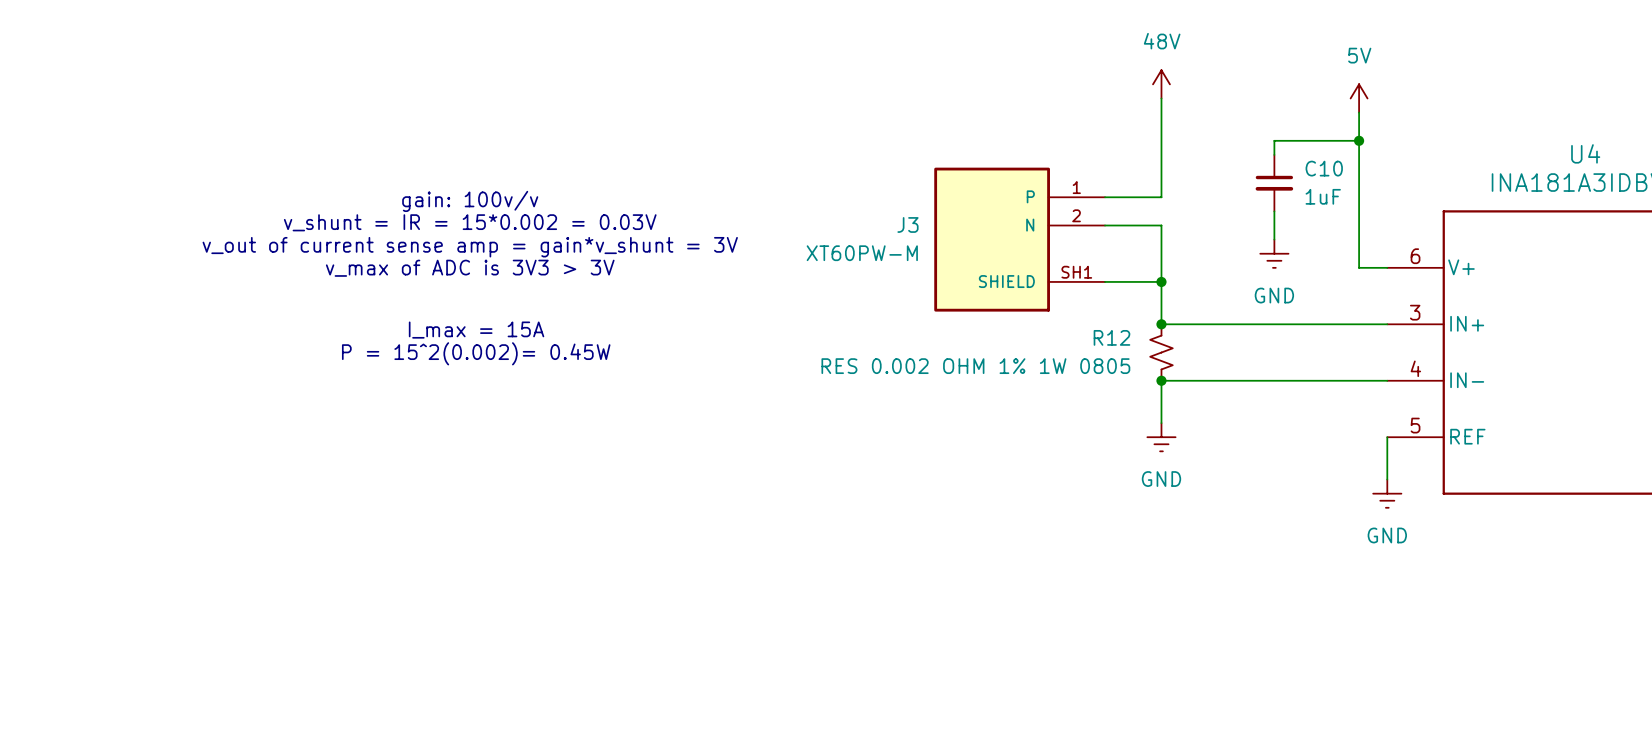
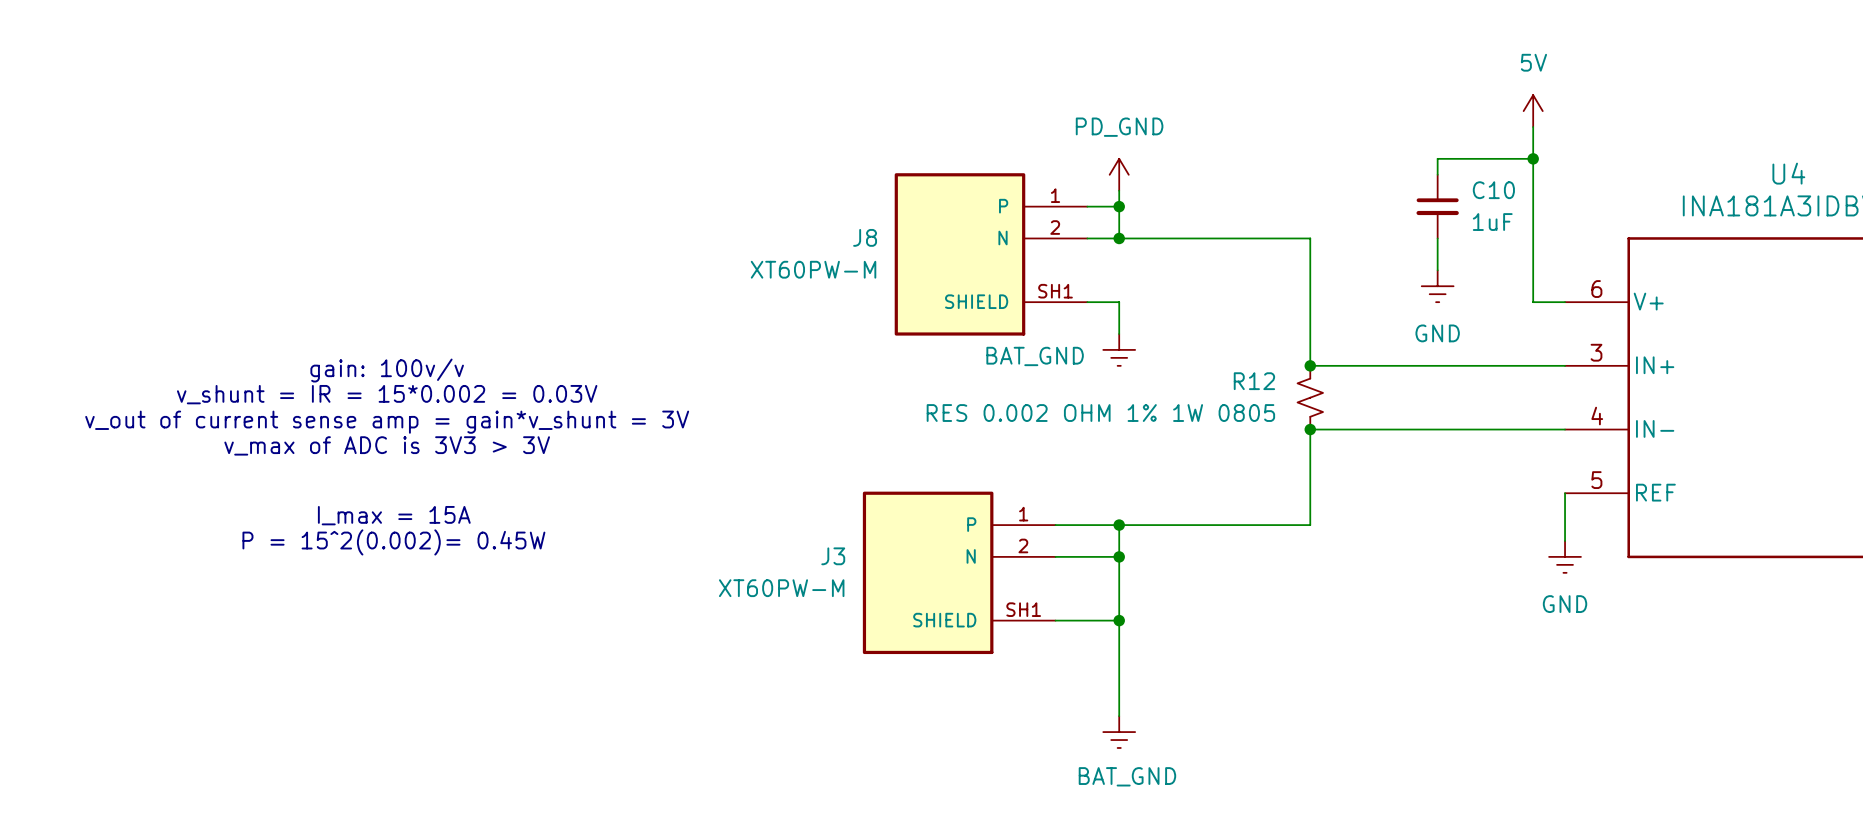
power symbol: 48V (1161, 84) -> none
wire: (1161, 98) (1161, 197) (1105, 197) -> none
power symbol: none -> PD_GND (1119, 174)
junction: none -> (1119, 206)
text position: gain: 100v/v (470, 201) -> gain: 100v/v (387, 370)
junction: none -> (1119, 238)
text position: v_shunt = IR = 15*0.002 = 0.03V (470, 222) -> v_shunt = IR = 15*0.002 = 0.03V (387, 394)
J8: none -> XT60PW-M (991, 254)
wire: (1105, 225) (1161, 225) -> (1087, 238) (1310, 238) (1310, 254)
J3 position: (1019, 239) -> (959, 572)
text position: v_out of current sense amp = gain*v_shunt = 3V (470, 247) -> v_out of current sense amp = gain*v_shunt = 3V (387, 422)
text position: v_max of ADC is 3V3 > 3V (470, 268) -> v_max of ADC is 3V3 > 3V (387, 445)
wire: (1105, 281) (1161, 281) -> (1055, 556) (1119, 556)
junction: (1161, 281) -> none
power symbol: none -> BAT_GND (1119, 349)
text position: I_max = 15A (476, 330) -> I_max = 15A (394, 515)
text position: P = 15^2(0.002)= 0.45W (476, 353) -> P = 15^2(0.002)= 0.45W (393, 542)
wire: none -> (1310, 477) (1310, 525) (1055, 525)
power symbol: GND (1161, 437) -> none
wire: none -> (1119, 525) (1119, 716)
junction: none -> (1119, 525)
junction: none -> (1119, 556)
wire: none -> (1055, 620) (1119, 620)
junction: none -> (1119, 620)
power symbol: none -> BAT_GND (1119, 732)

